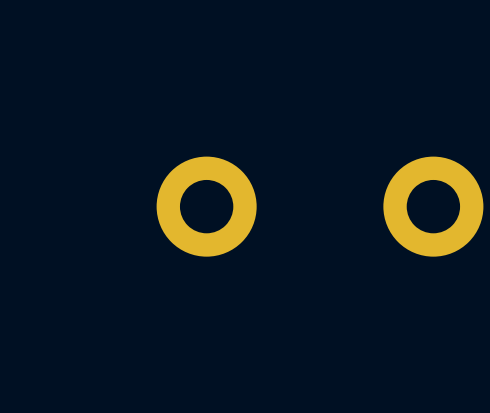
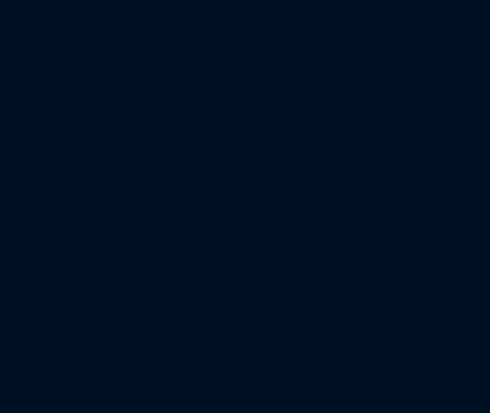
part: (320, 206) -> none

